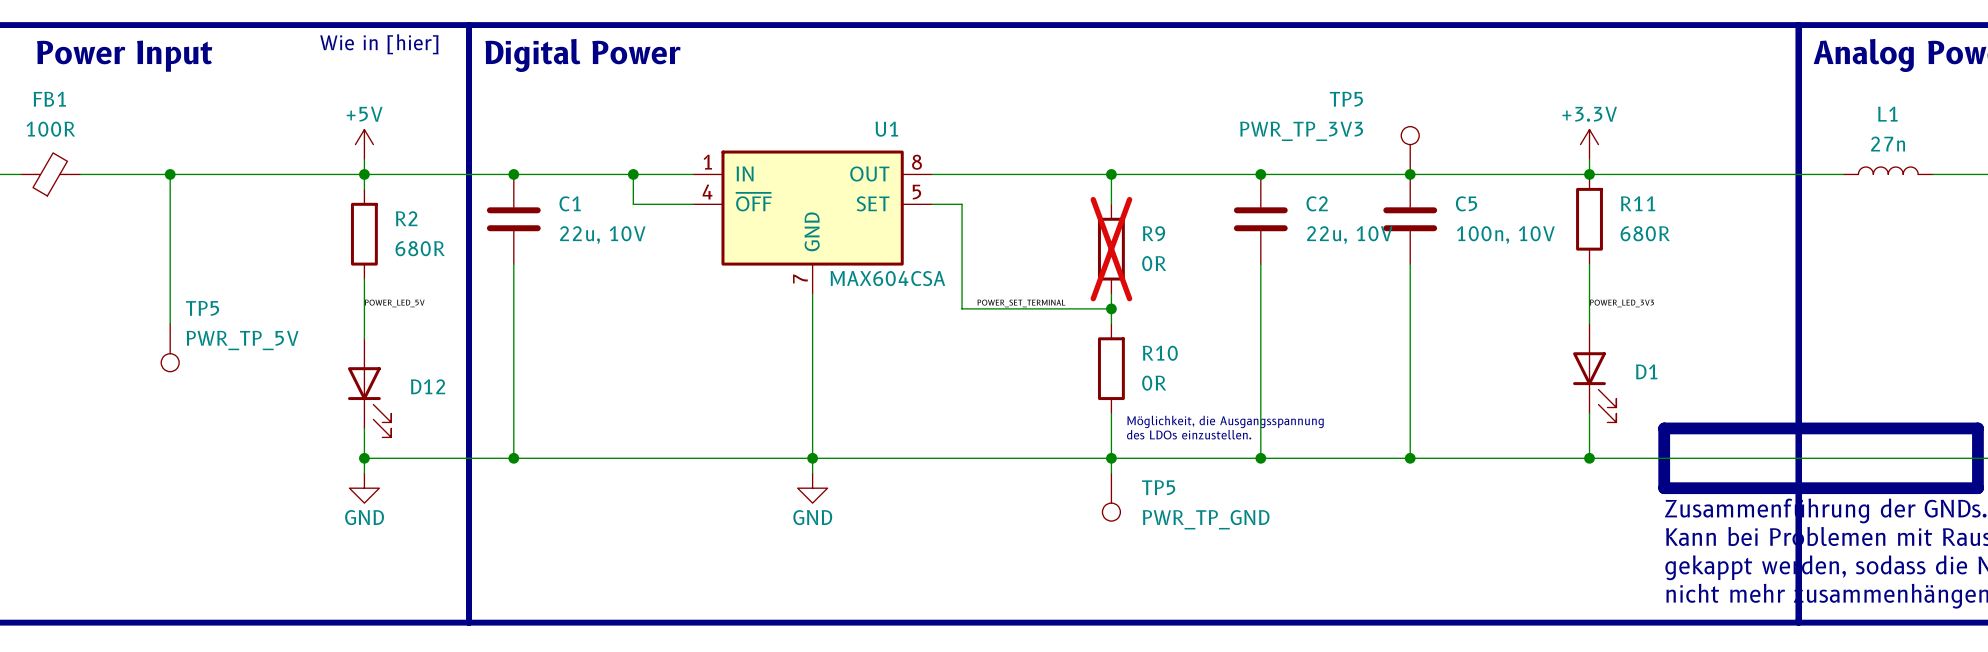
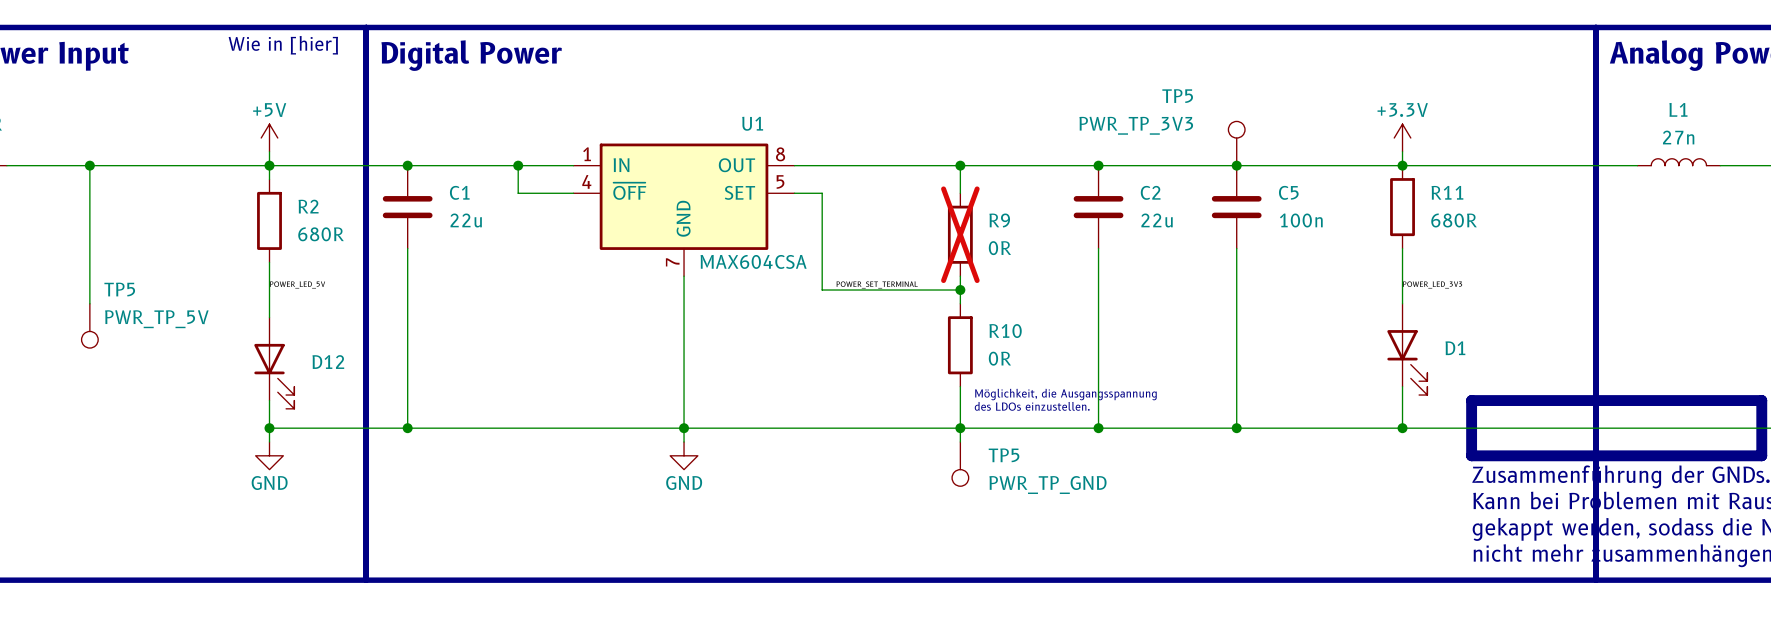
C1 value: 22u, 10V (602, 235) -> 22u (466, 220)
C2 value: 22u, 10V (1349, 235) -> 22u (1157, 220)
C5 value: 100n, 10V (1505, 235) -> 100n (1301, 220)

